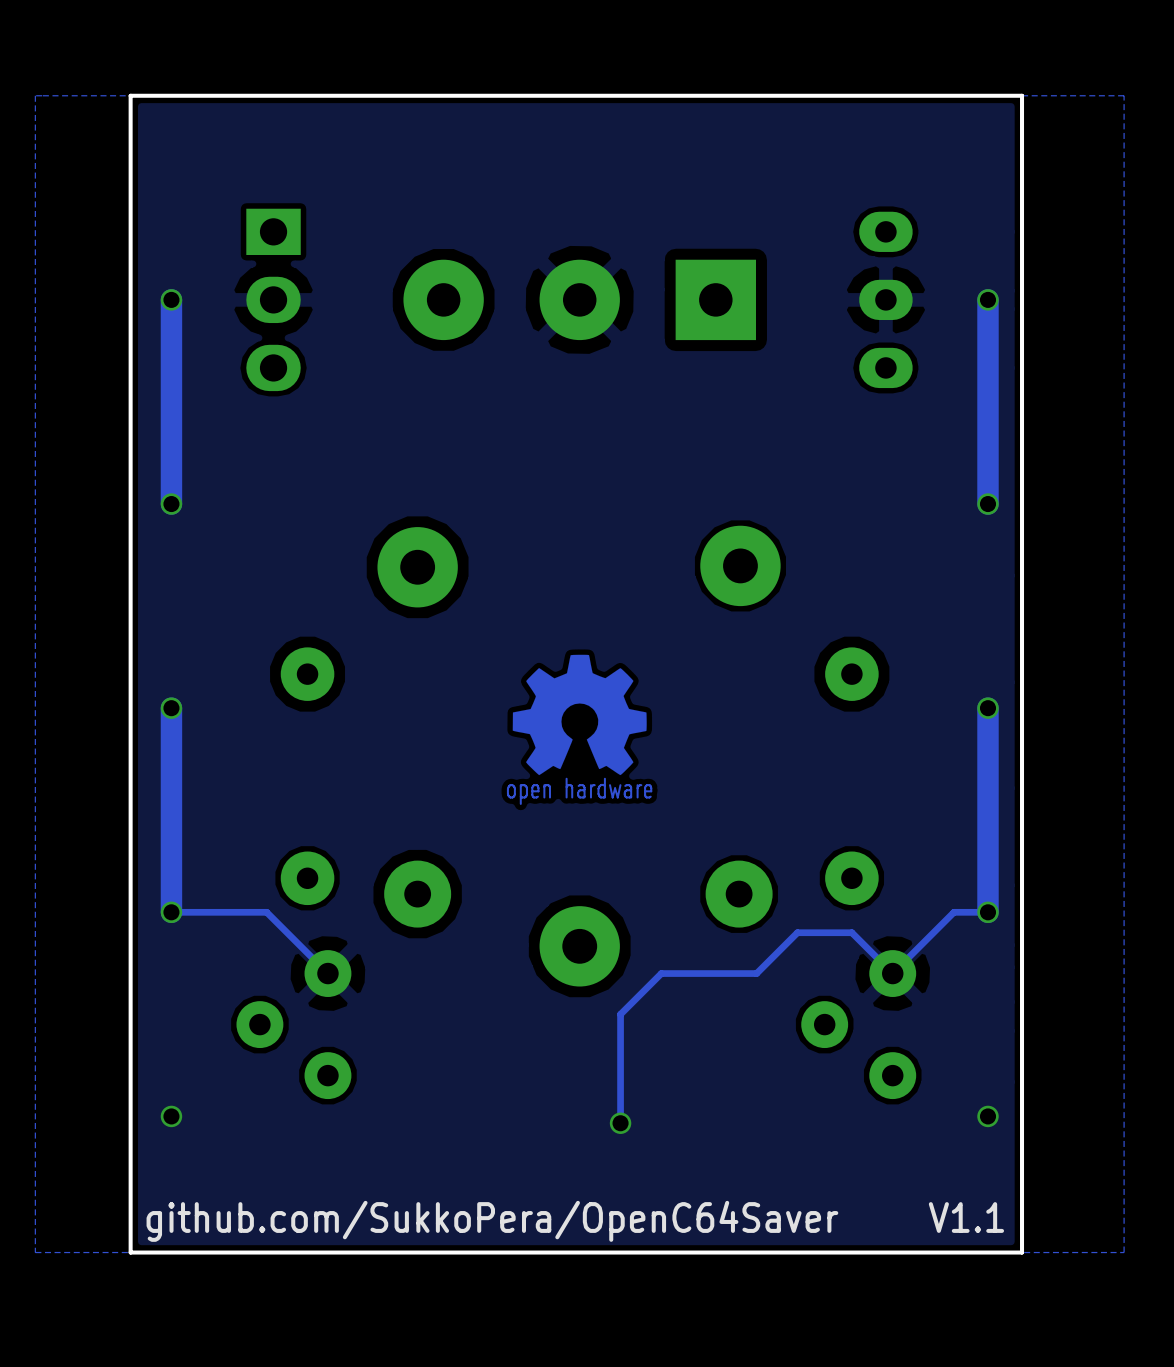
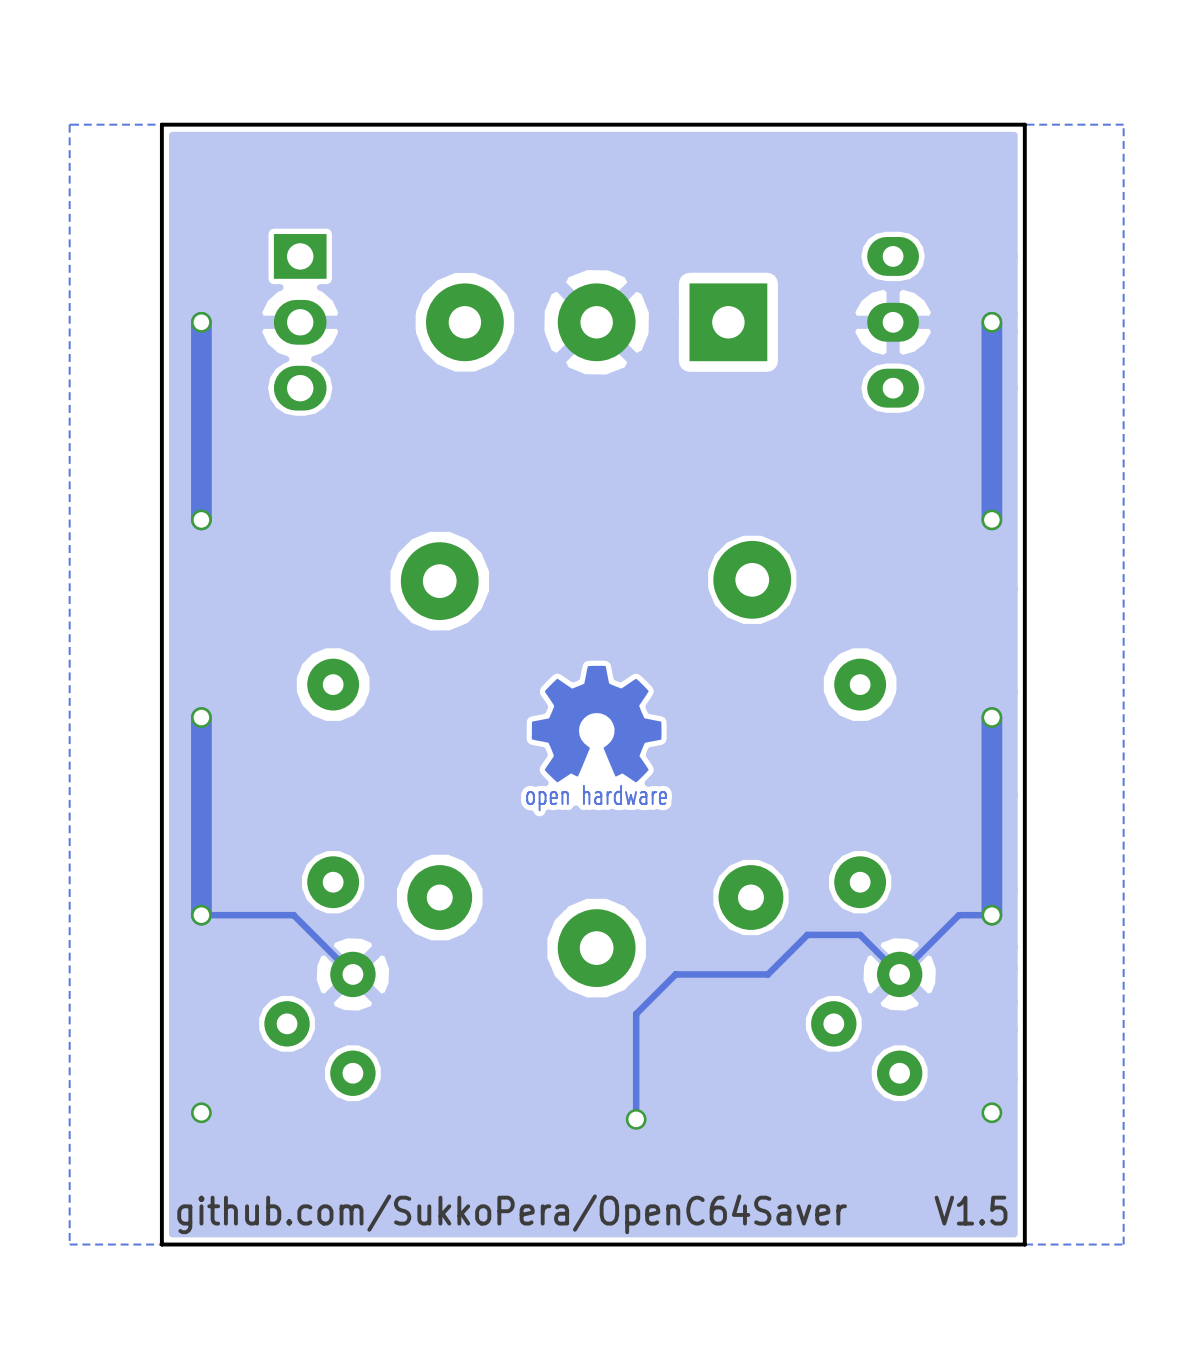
text: V1.1 (966, 1217) -> V1.5 (971, 1210)

